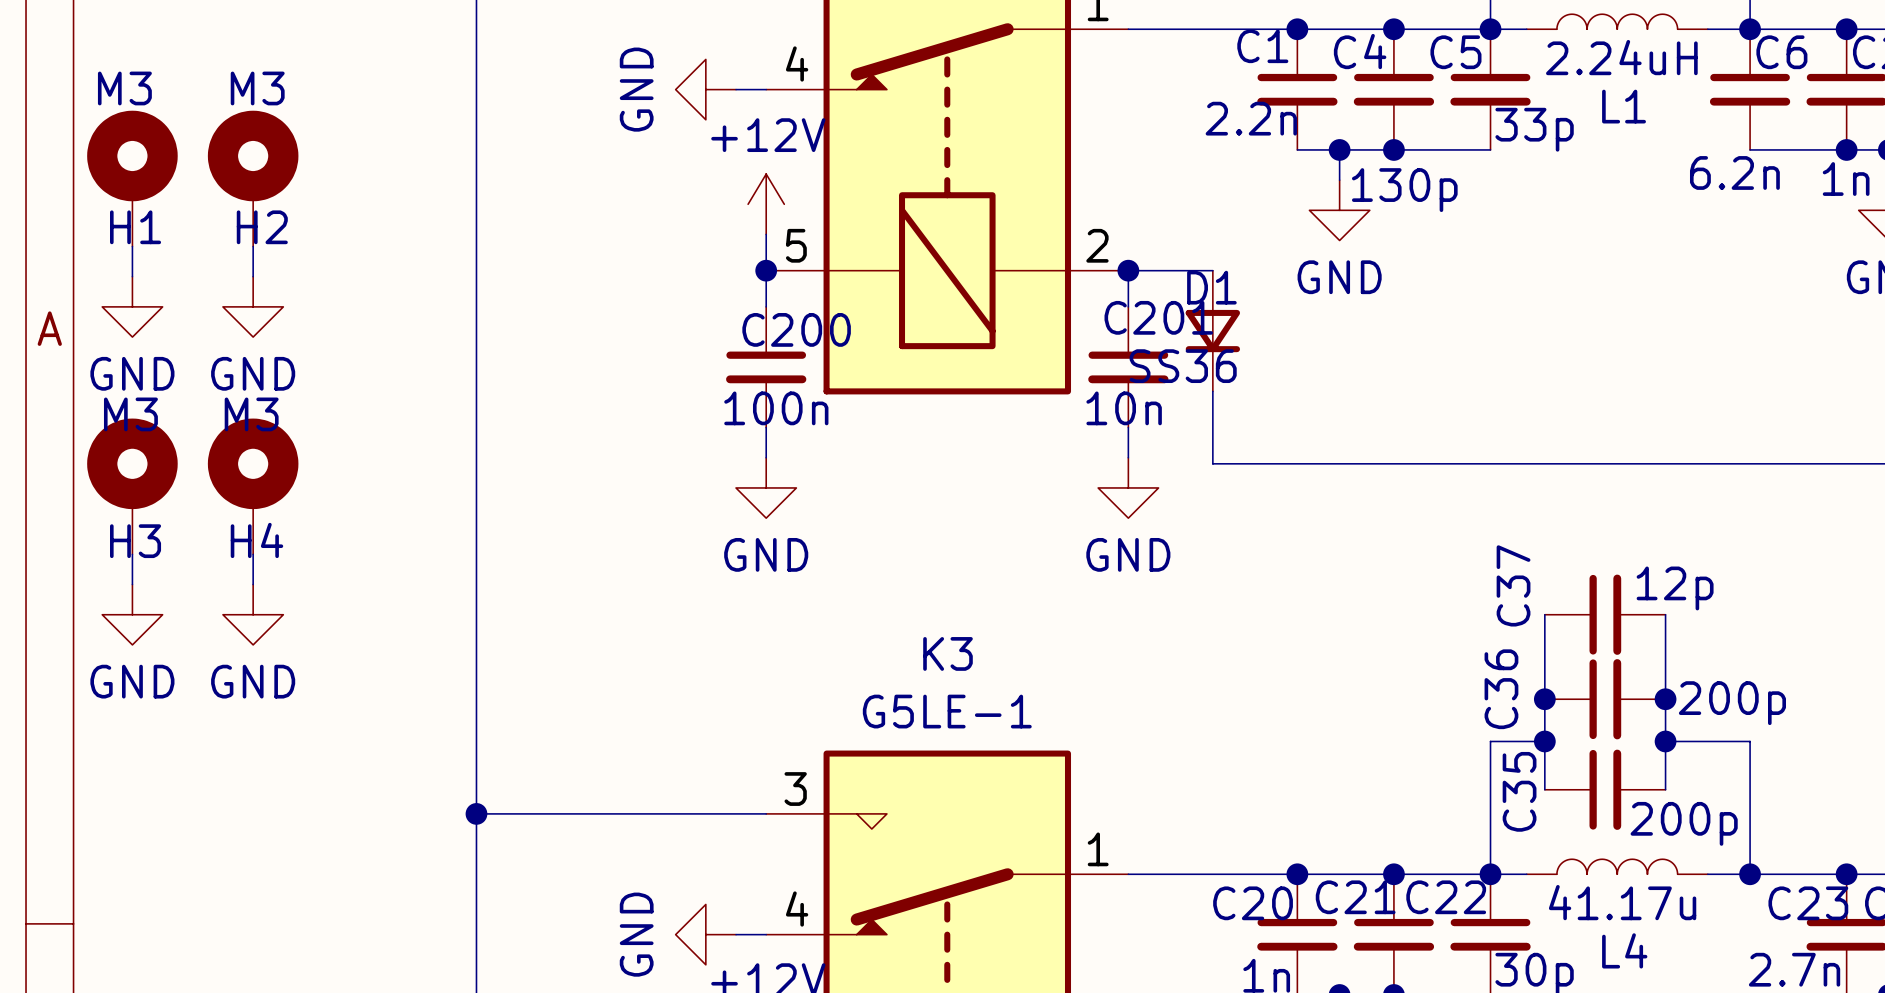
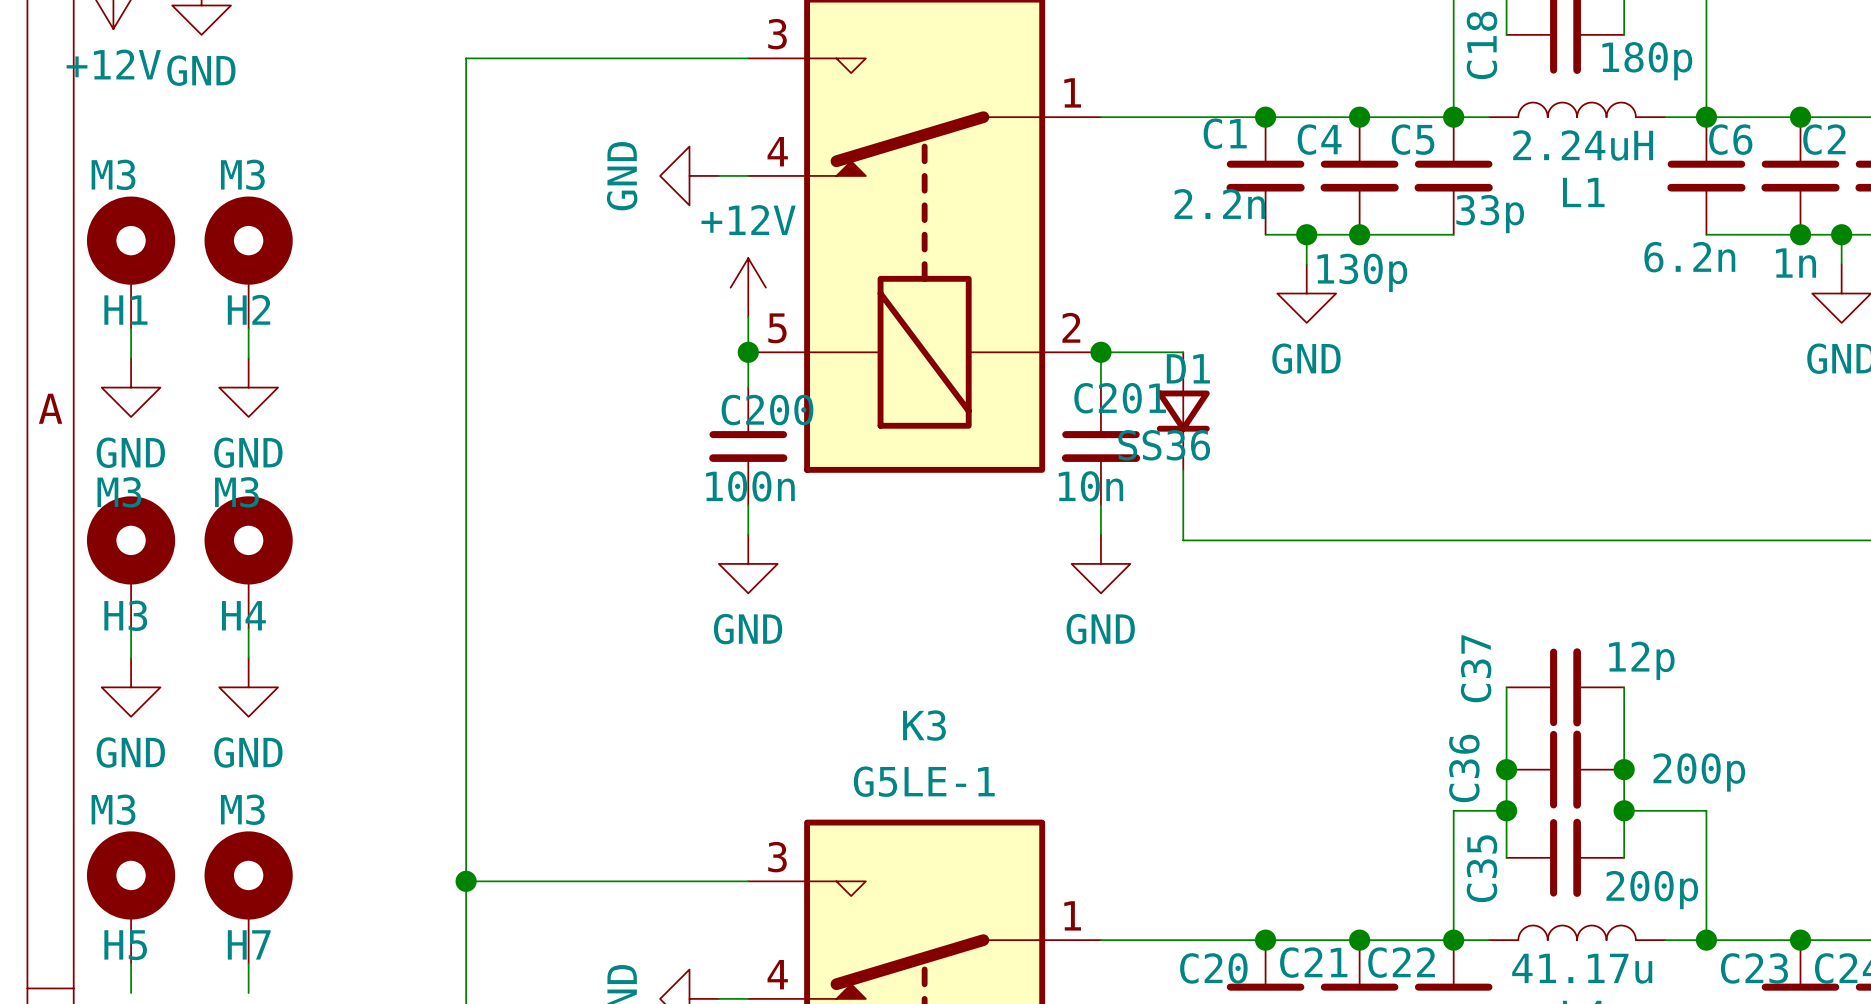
H5: none -> M3 (131, 897)
H7: none -> M3 (248, 897)
wire: none -> (131, 963) (131, 993)
wire: none -> (248, 963) (248, 993)

